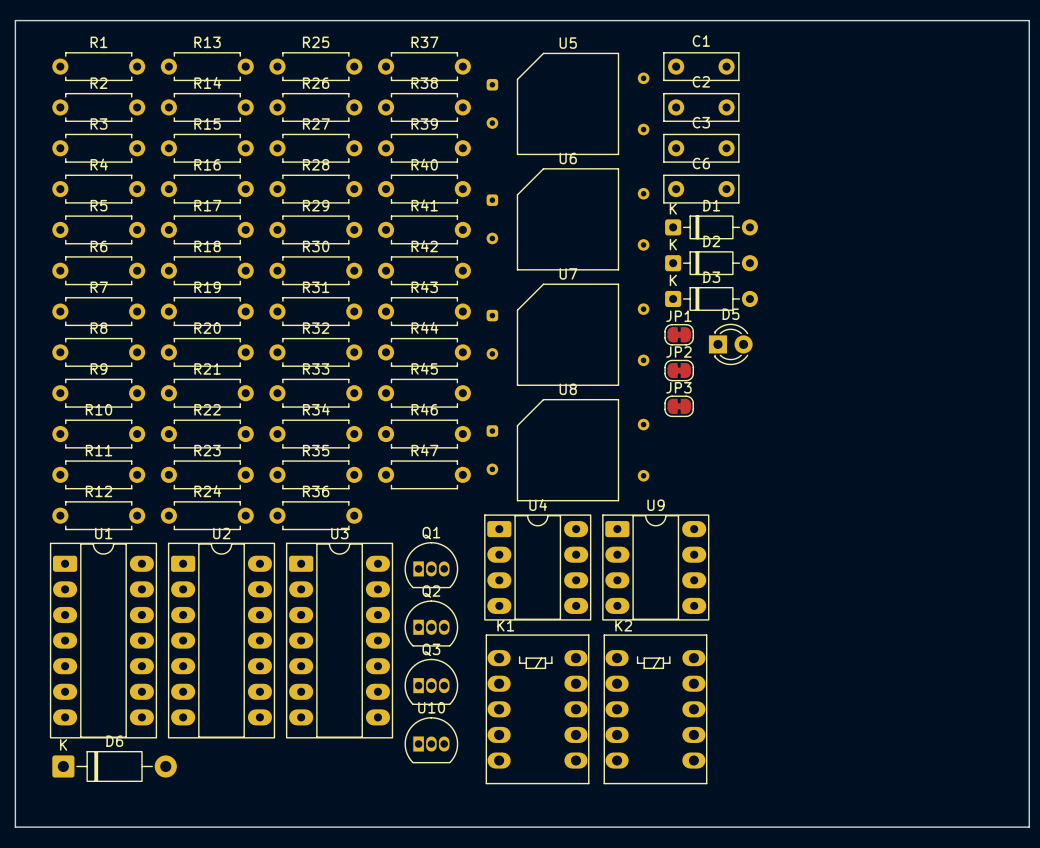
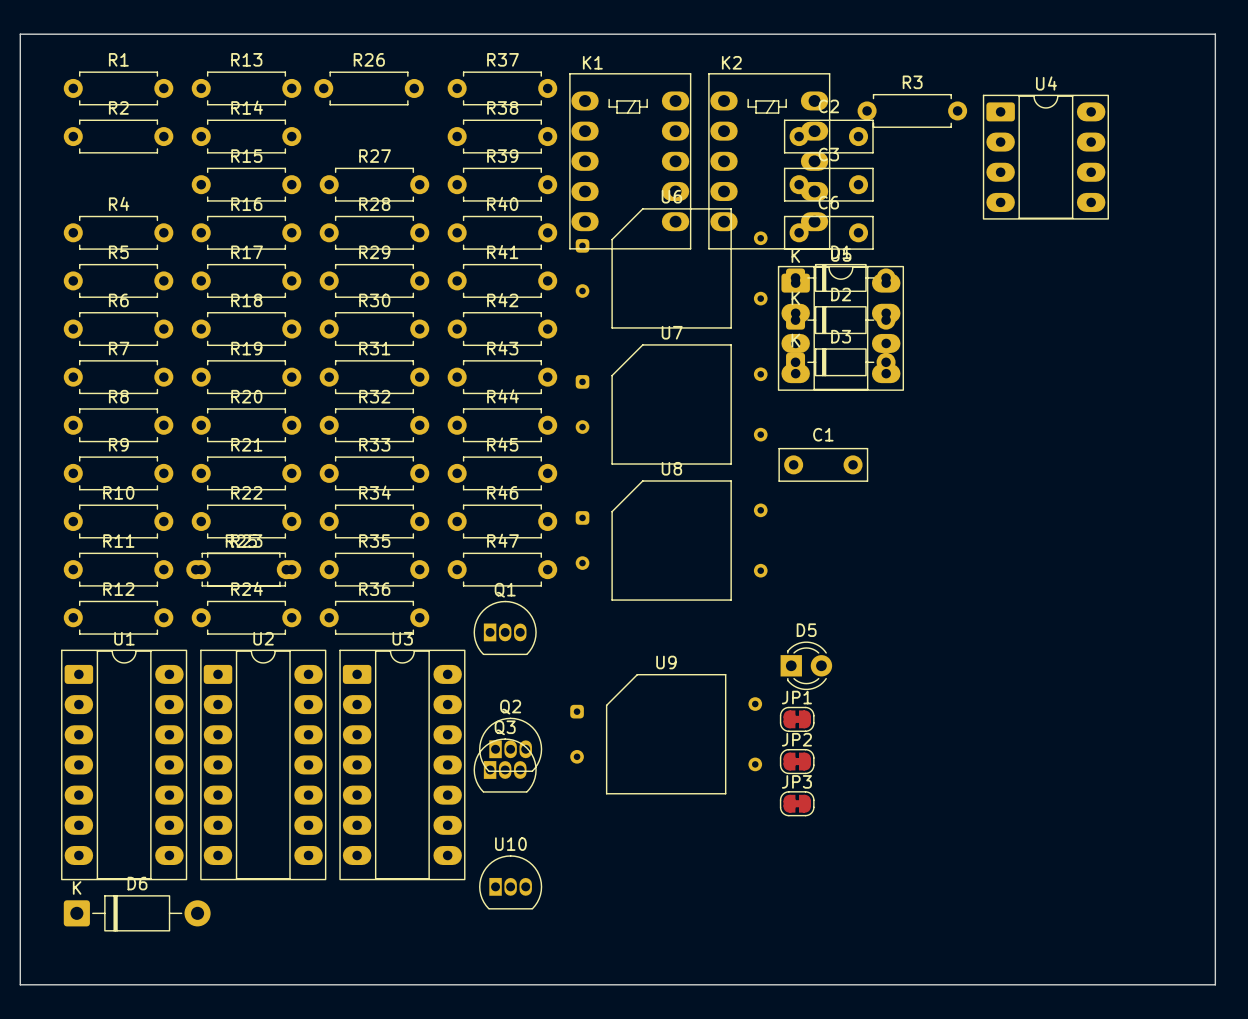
U5 footprint: [486, 52, 650, 156] -> [777, 265, 905, 391]
R25 position: (315, 66) -> (241, 569)
C1 position: (701, 66) -> (823, 464)
R26 position: (315, 107) -> (369, 88)
R3 position: (98, 148) -> (912, 110)
JP1 position: (679, 334) -> (797, 719)
D5 position: (730, 344) -> (806, 665)
JP2 position: (679, 370) -> (797, 761)
JP3 position: (679, 406) -> (797, 803)
U9 footprint: [602, 514, 710, 621] -> [570, 673, 763, 795]
Q1 position: (431, 565) -> (505, 627)
U4 position: (537, 567) -> (1045, 157)
Q3 position: (431, 681) -> (505, 765)
K1 position: (537, 709) -> (630, 161)
K2 position: (655, 709) -> (769, 161)

